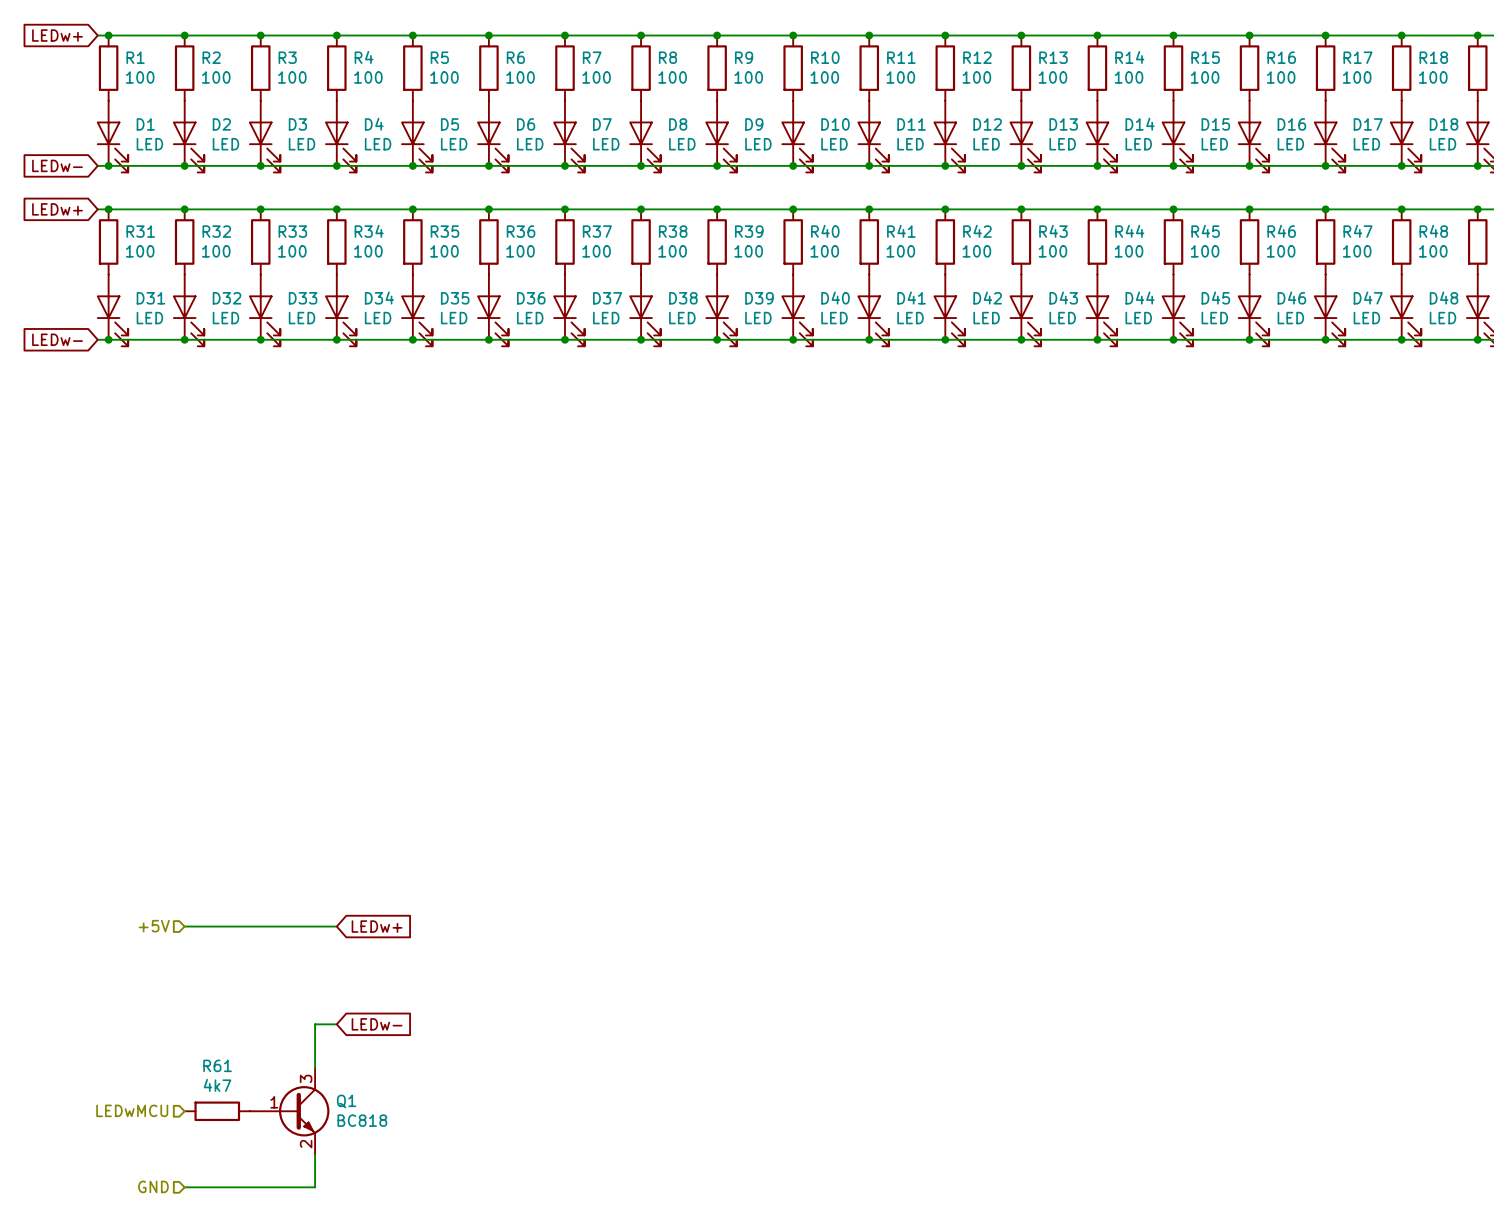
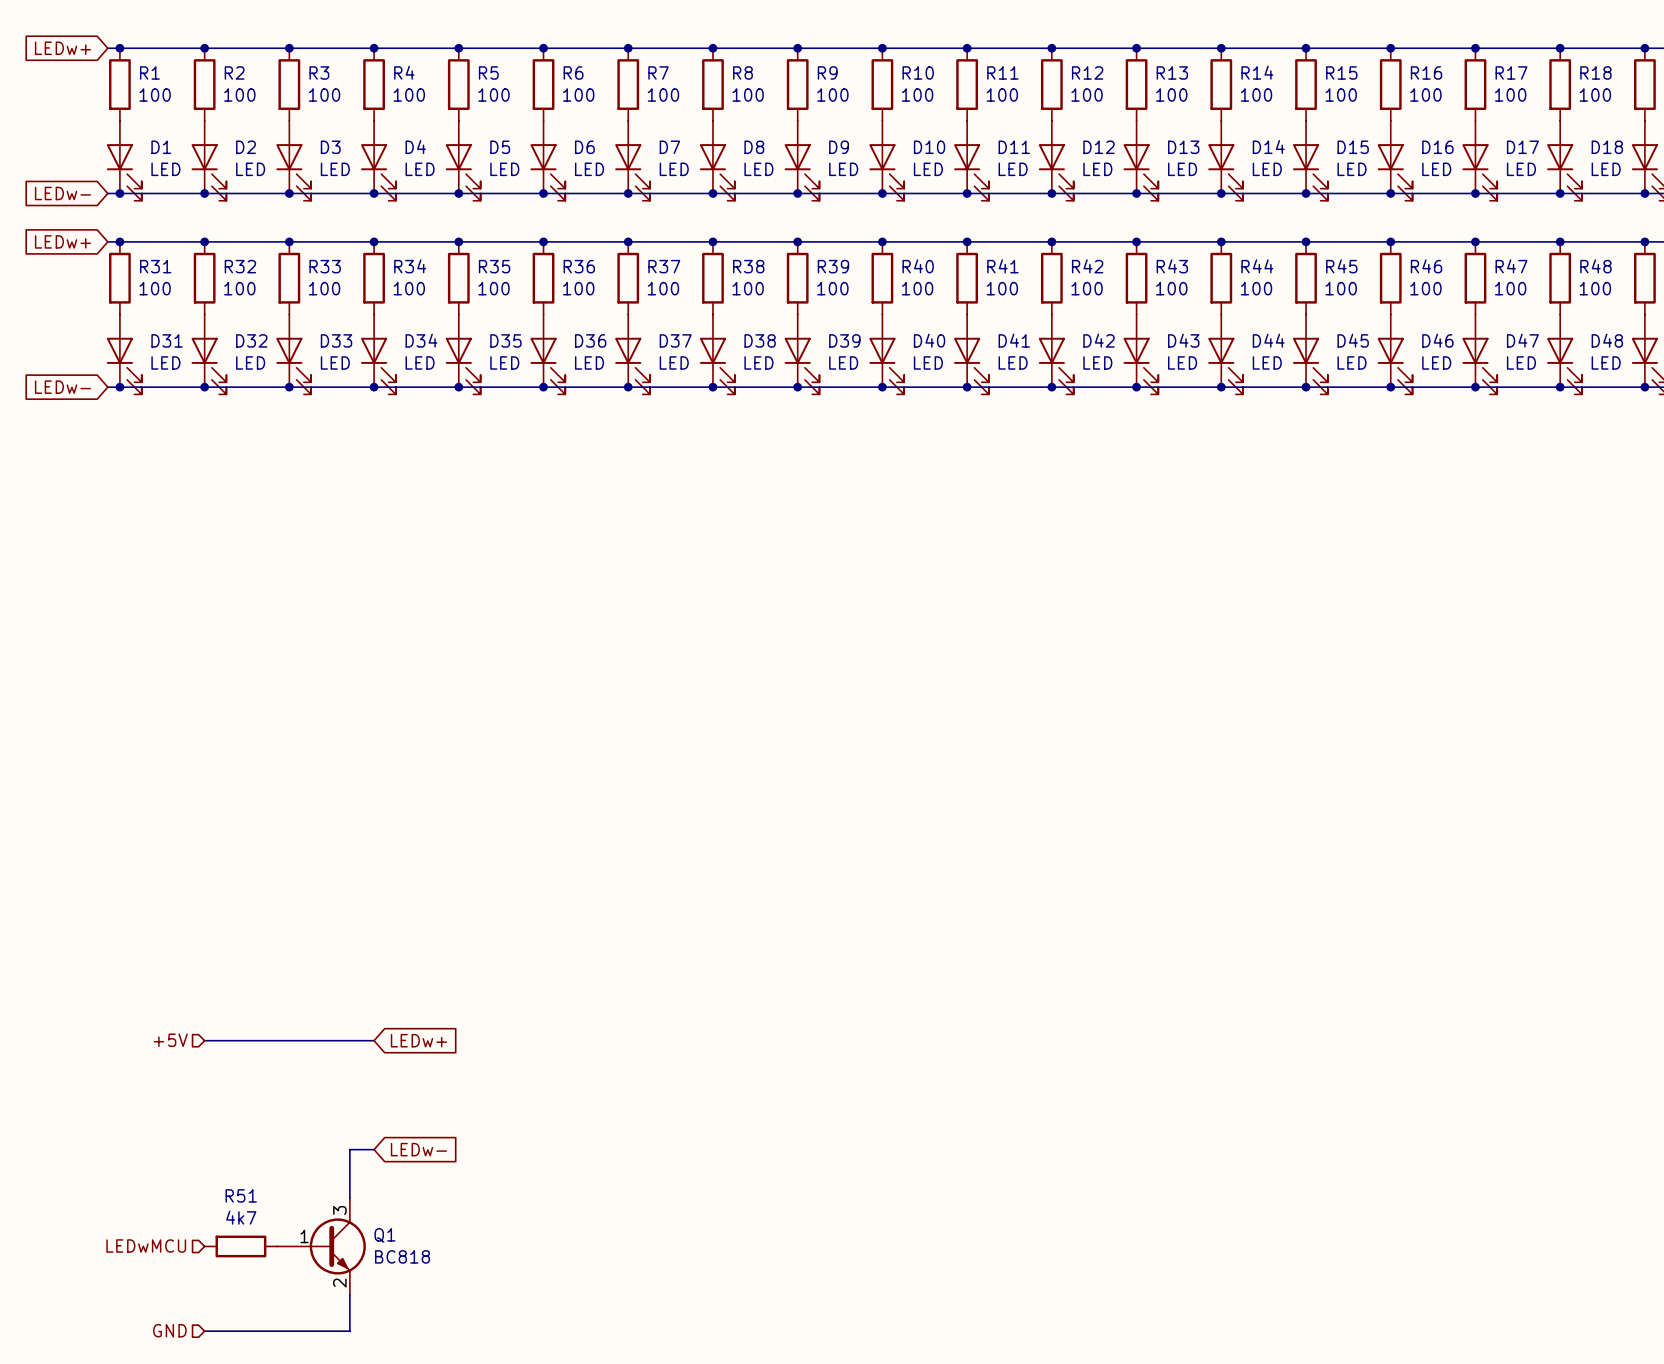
R61 name: R61 (217, 1065) -> R51 (241, 1195)

